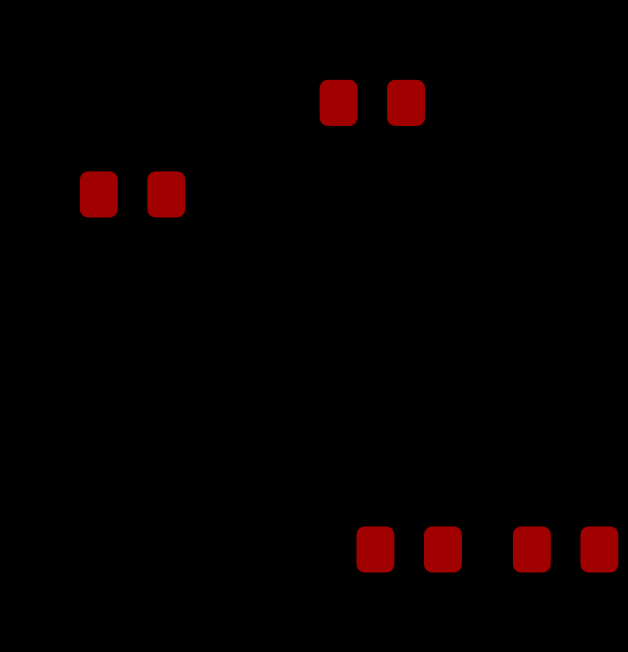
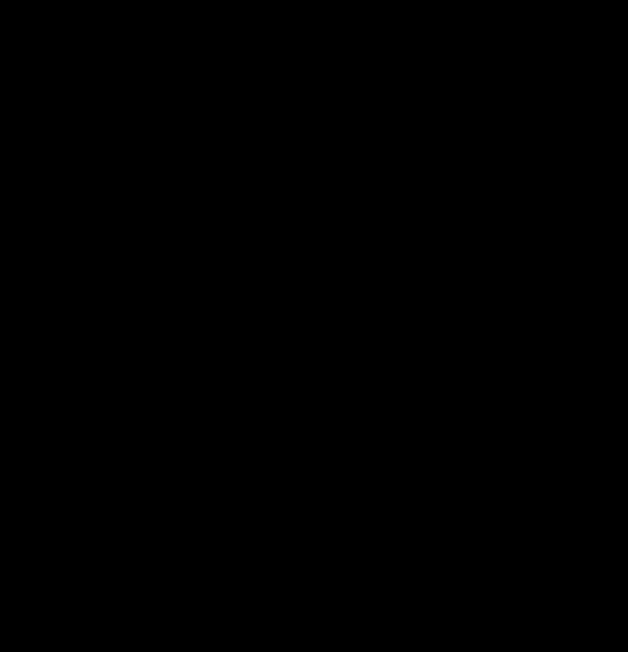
part: (372, 102) -> none
part: (132, 194) -> none
part: (409, 549) -> none
part: (565, 549) -> none

